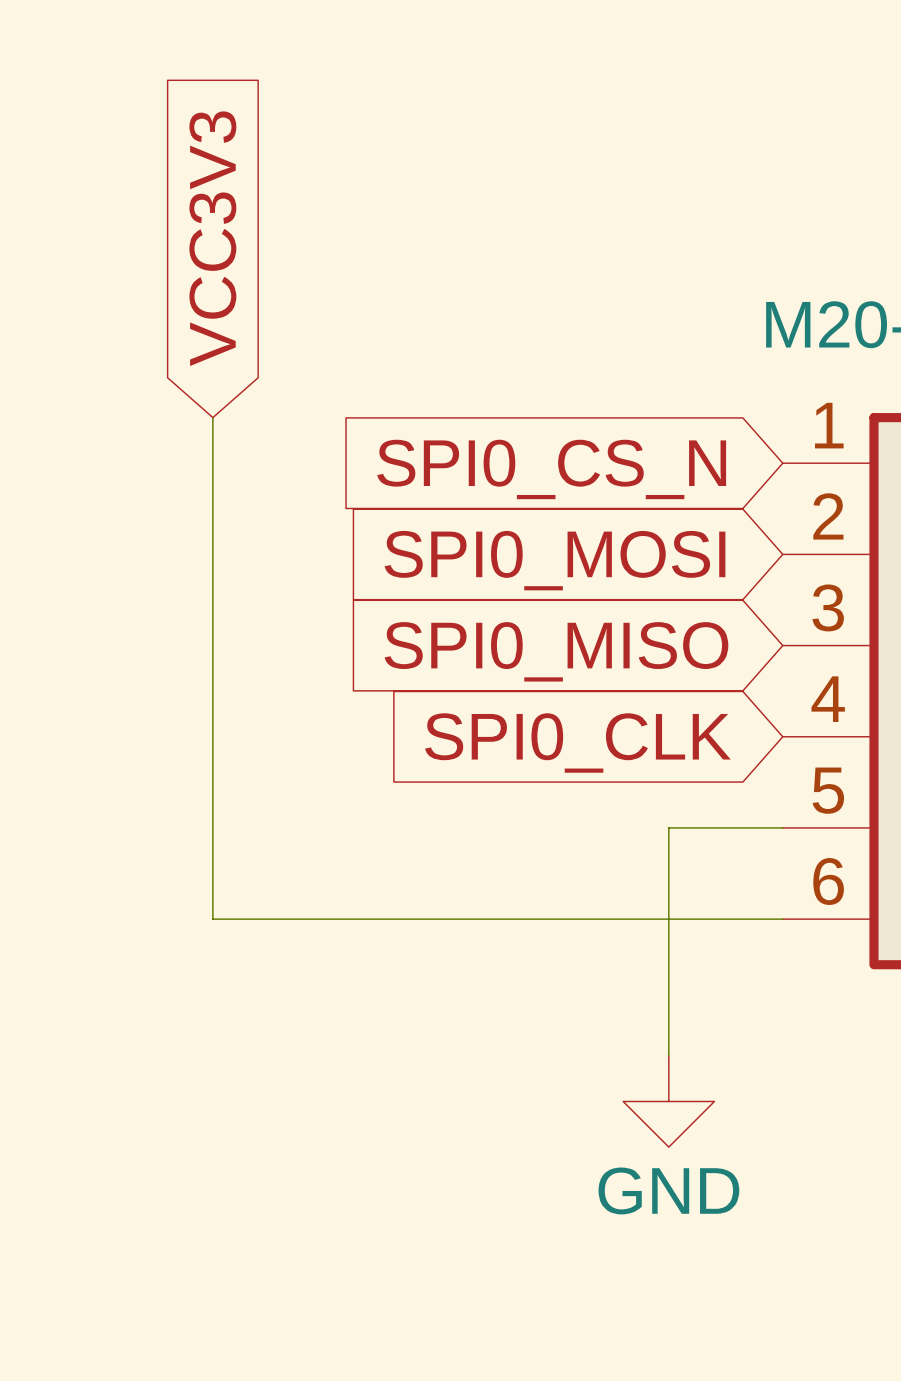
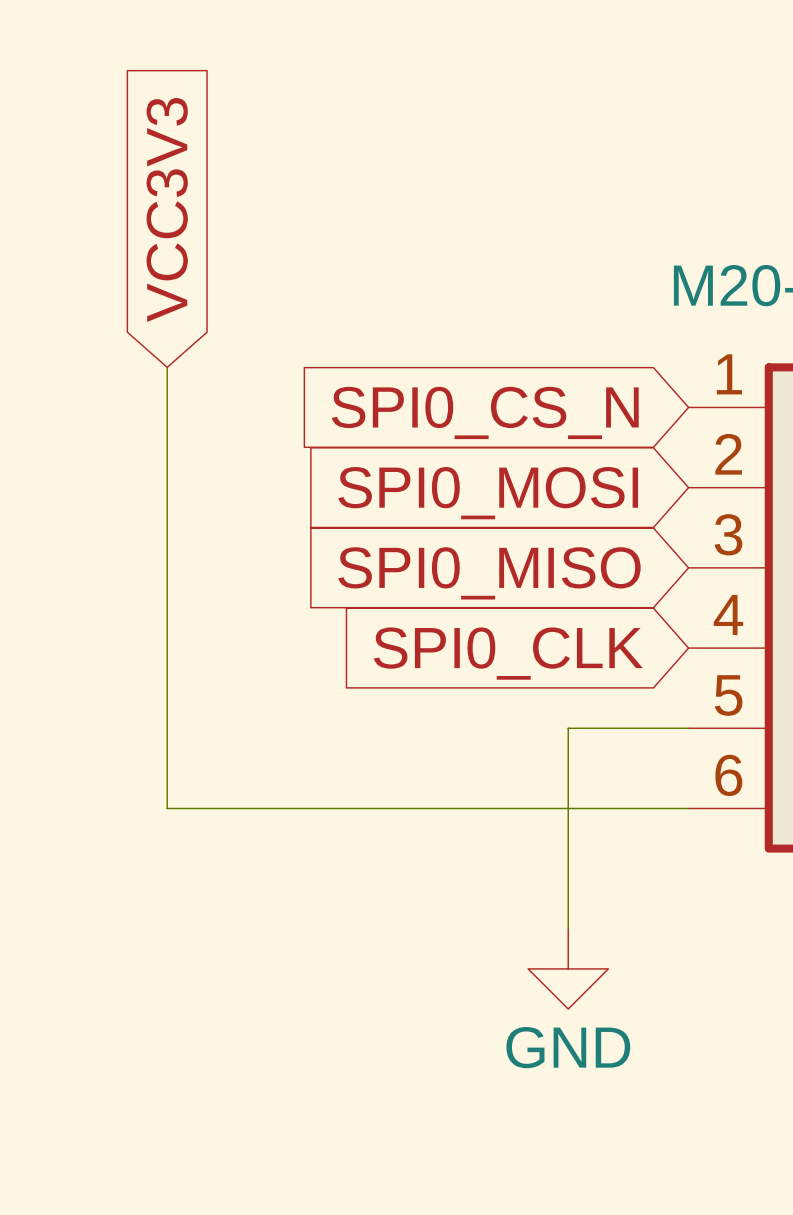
global label position: VCC3V3 (212, 238) -> VCC3V3 (167, 209)
wire: (212, 417) (212, 919) -> (167, 367) (167, 808) (187, 808)
wire: (668, 827) (668, 1055) -> (588, 728) (568, 728) (568, 928)
power symbol position: GND (668, 1101) -> GND (568, 968)

